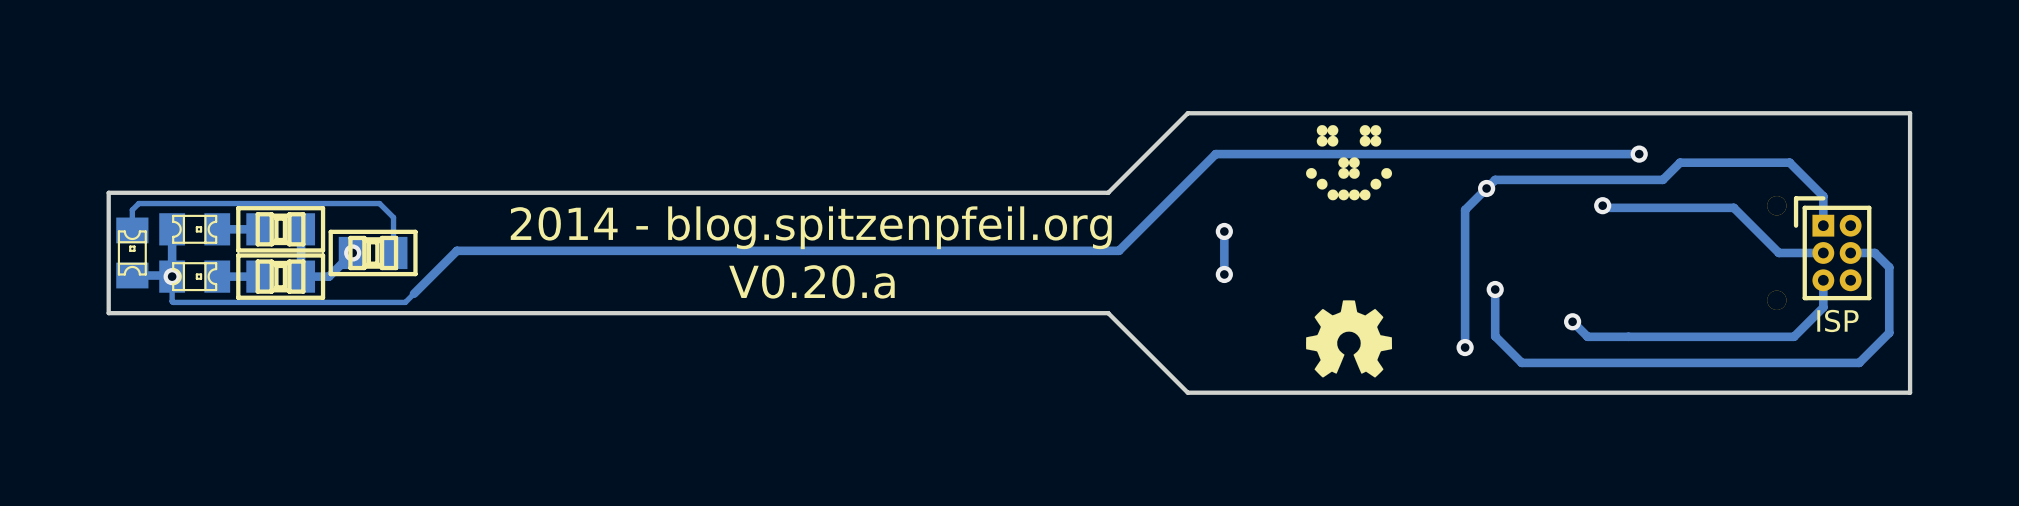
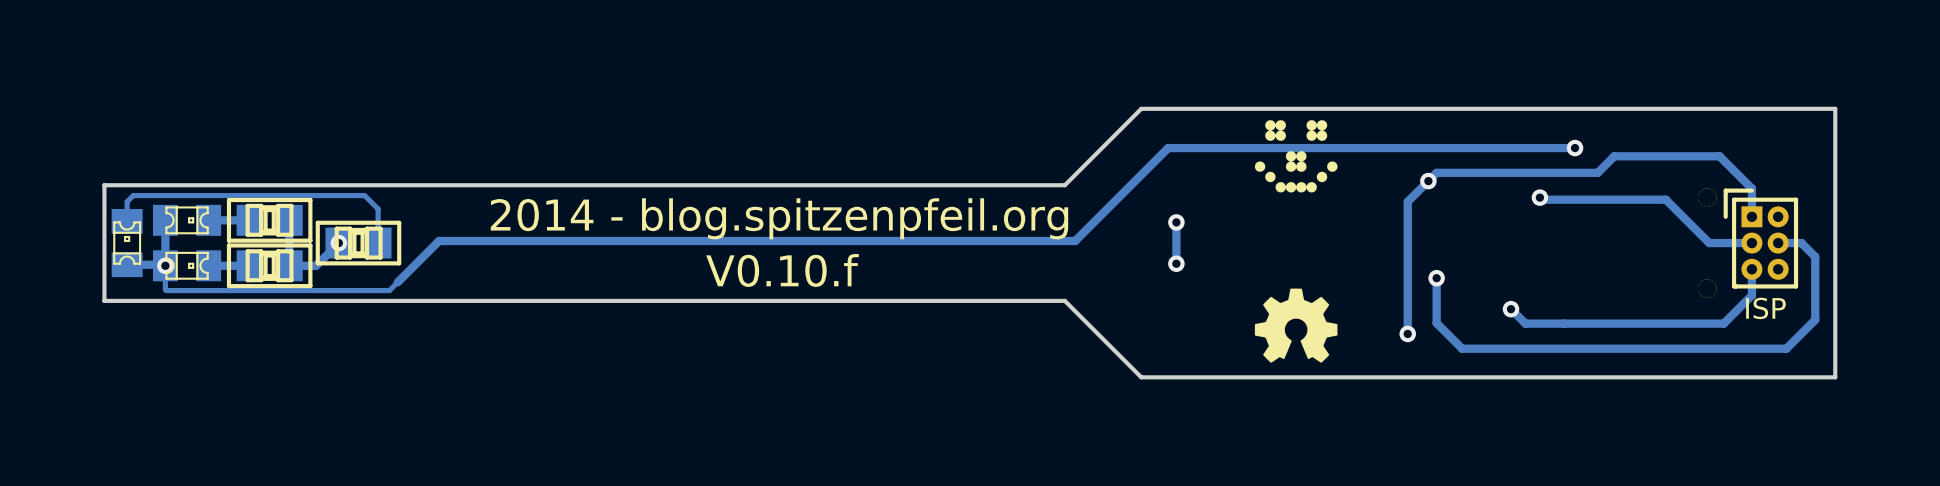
text: V0.20.a (811, 281) -> V0.10.f (782, 270)

